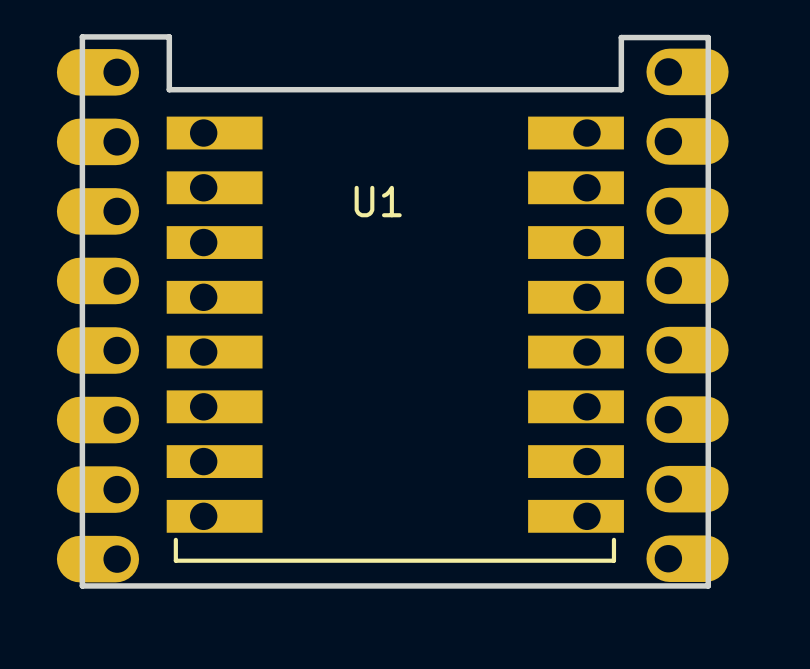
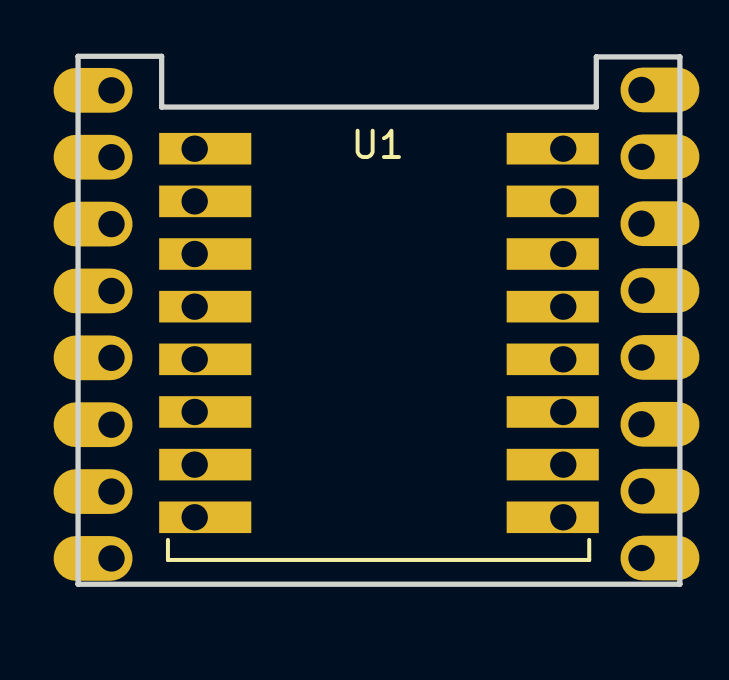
U1 name position: U1 (378, 201) -> U1 (378, 143)

